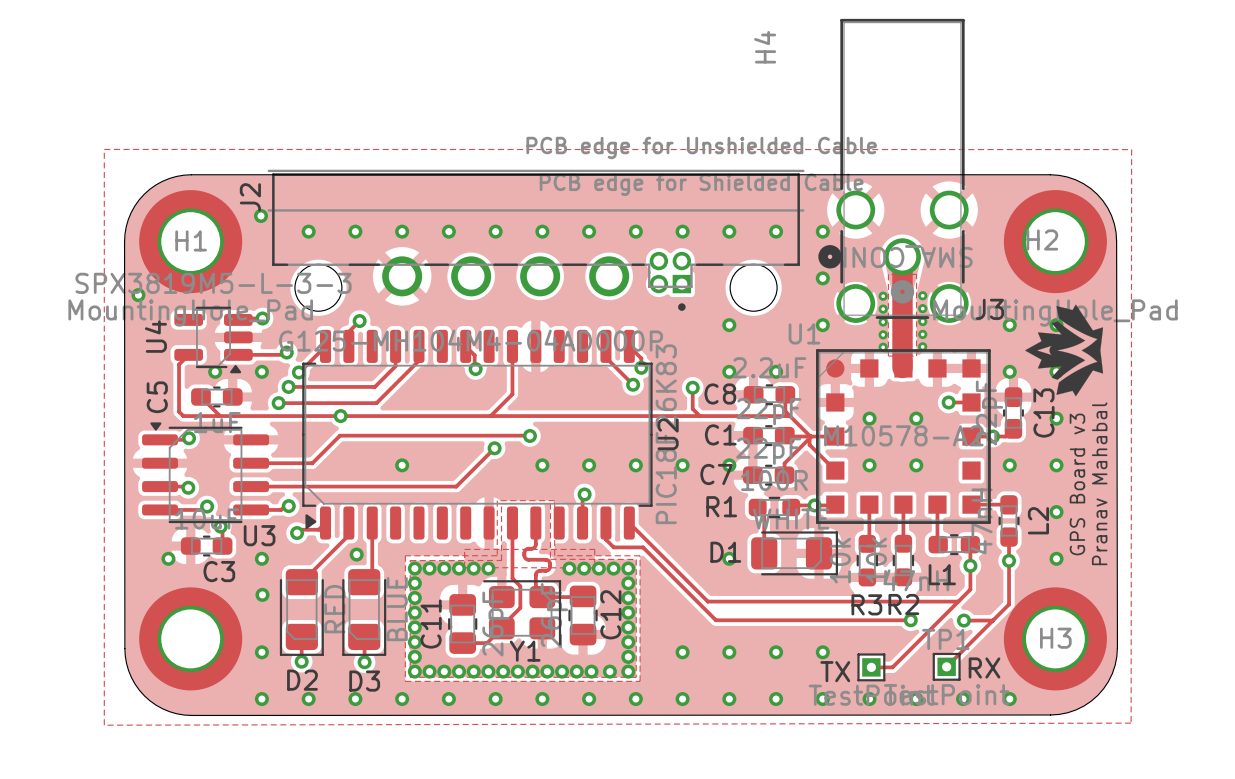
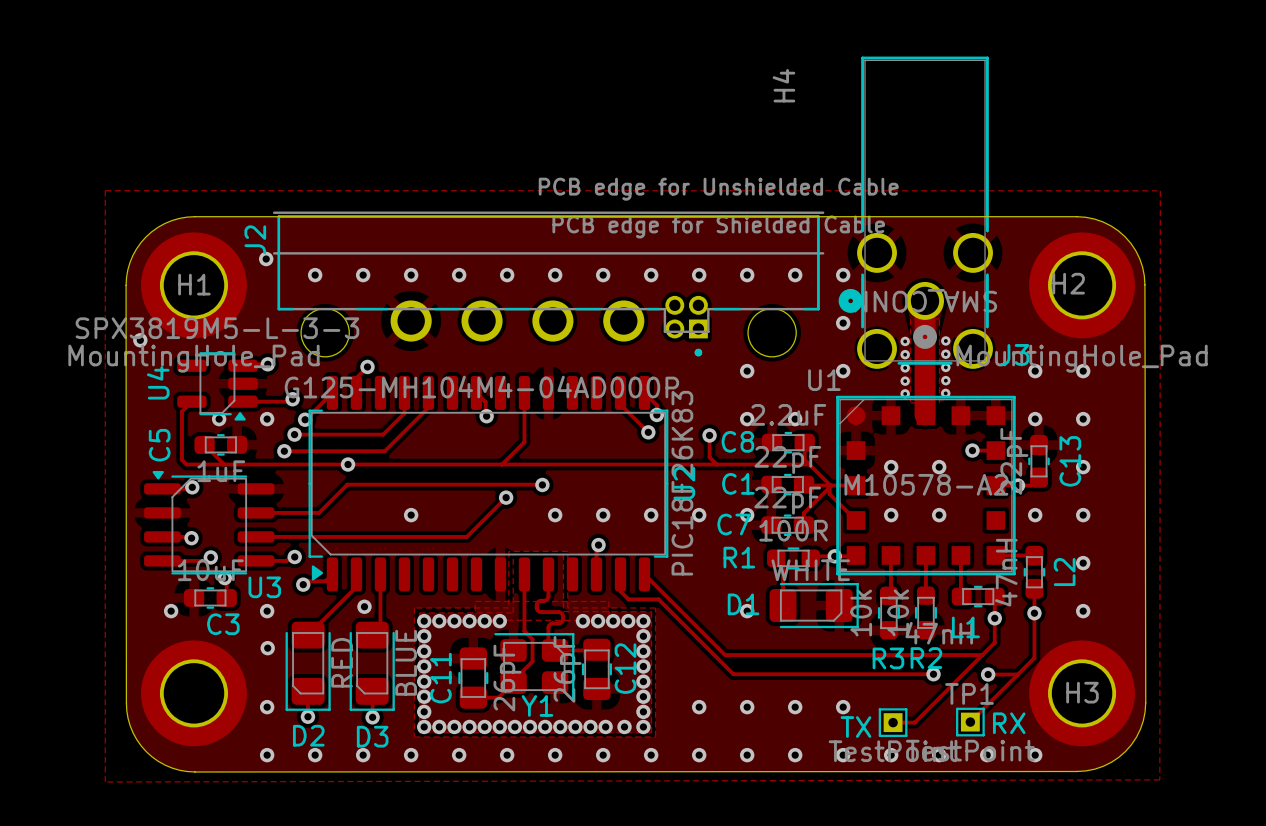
drawing: [1025, 304, 1104, 397] -> none
text: Pranav Mahabal (1099, 483) -> none
text: GPS Board v3 (1077, 484) -> none

